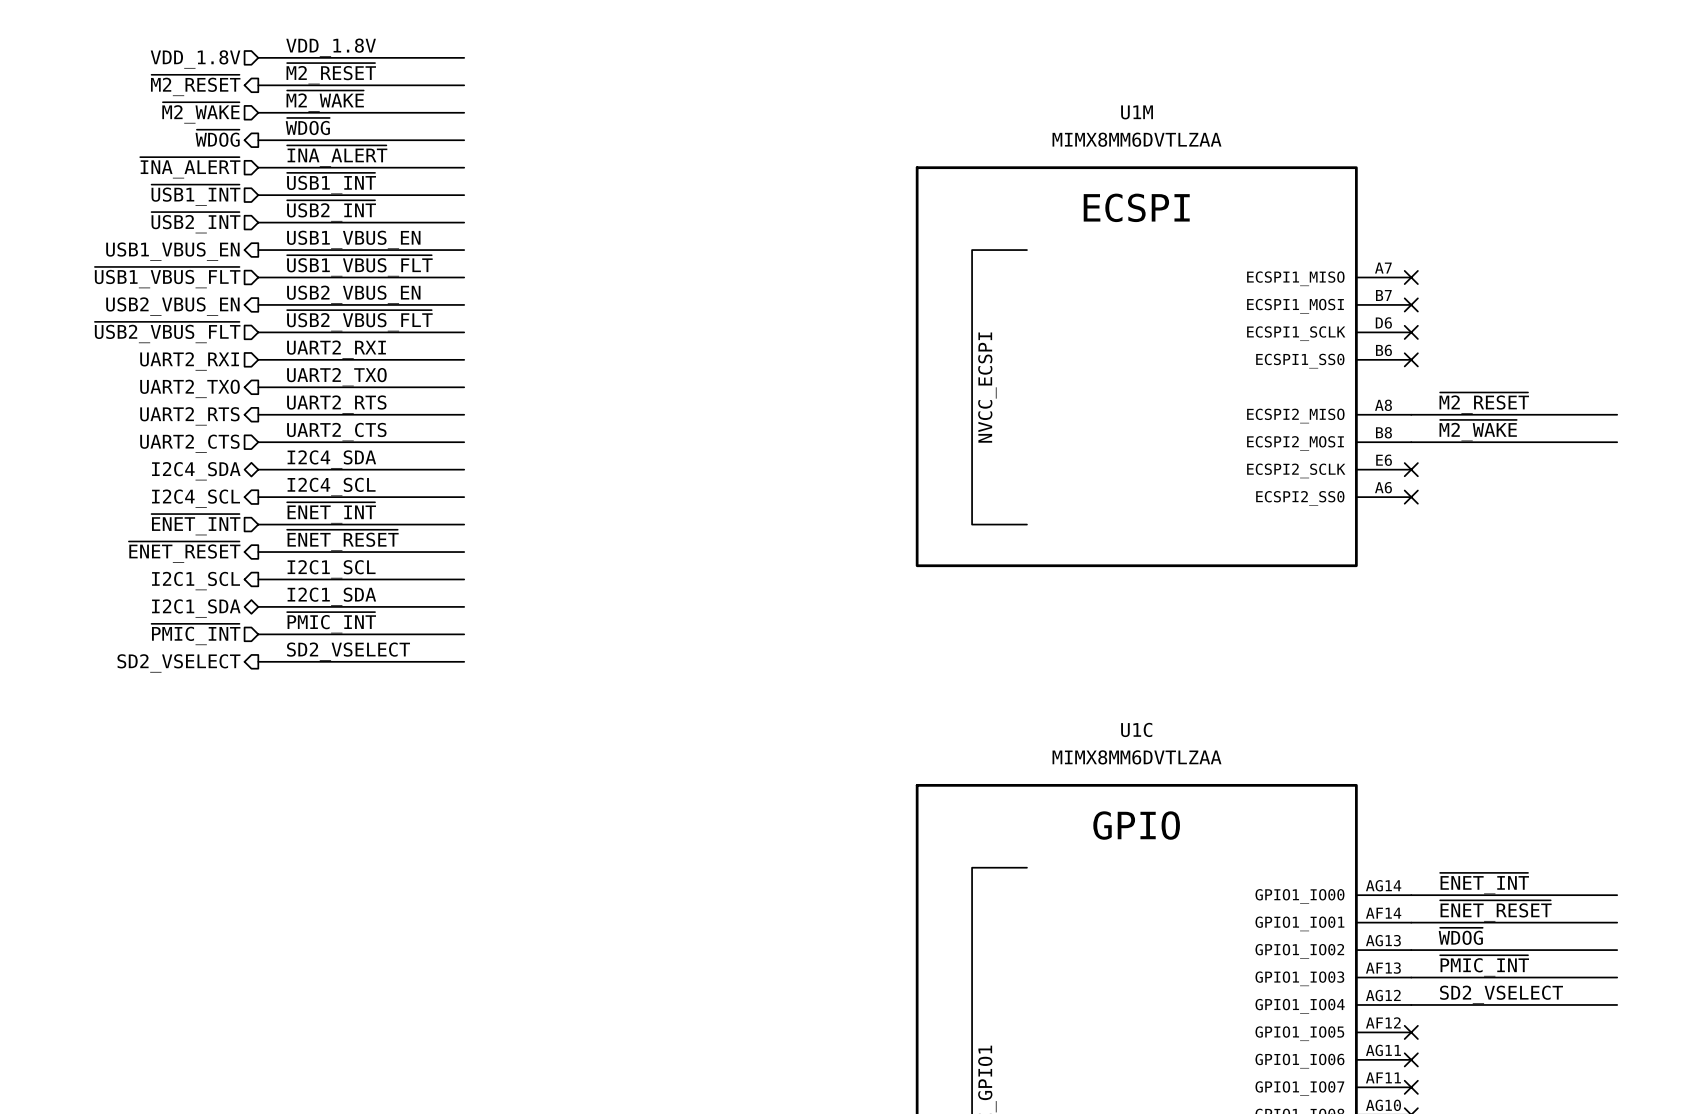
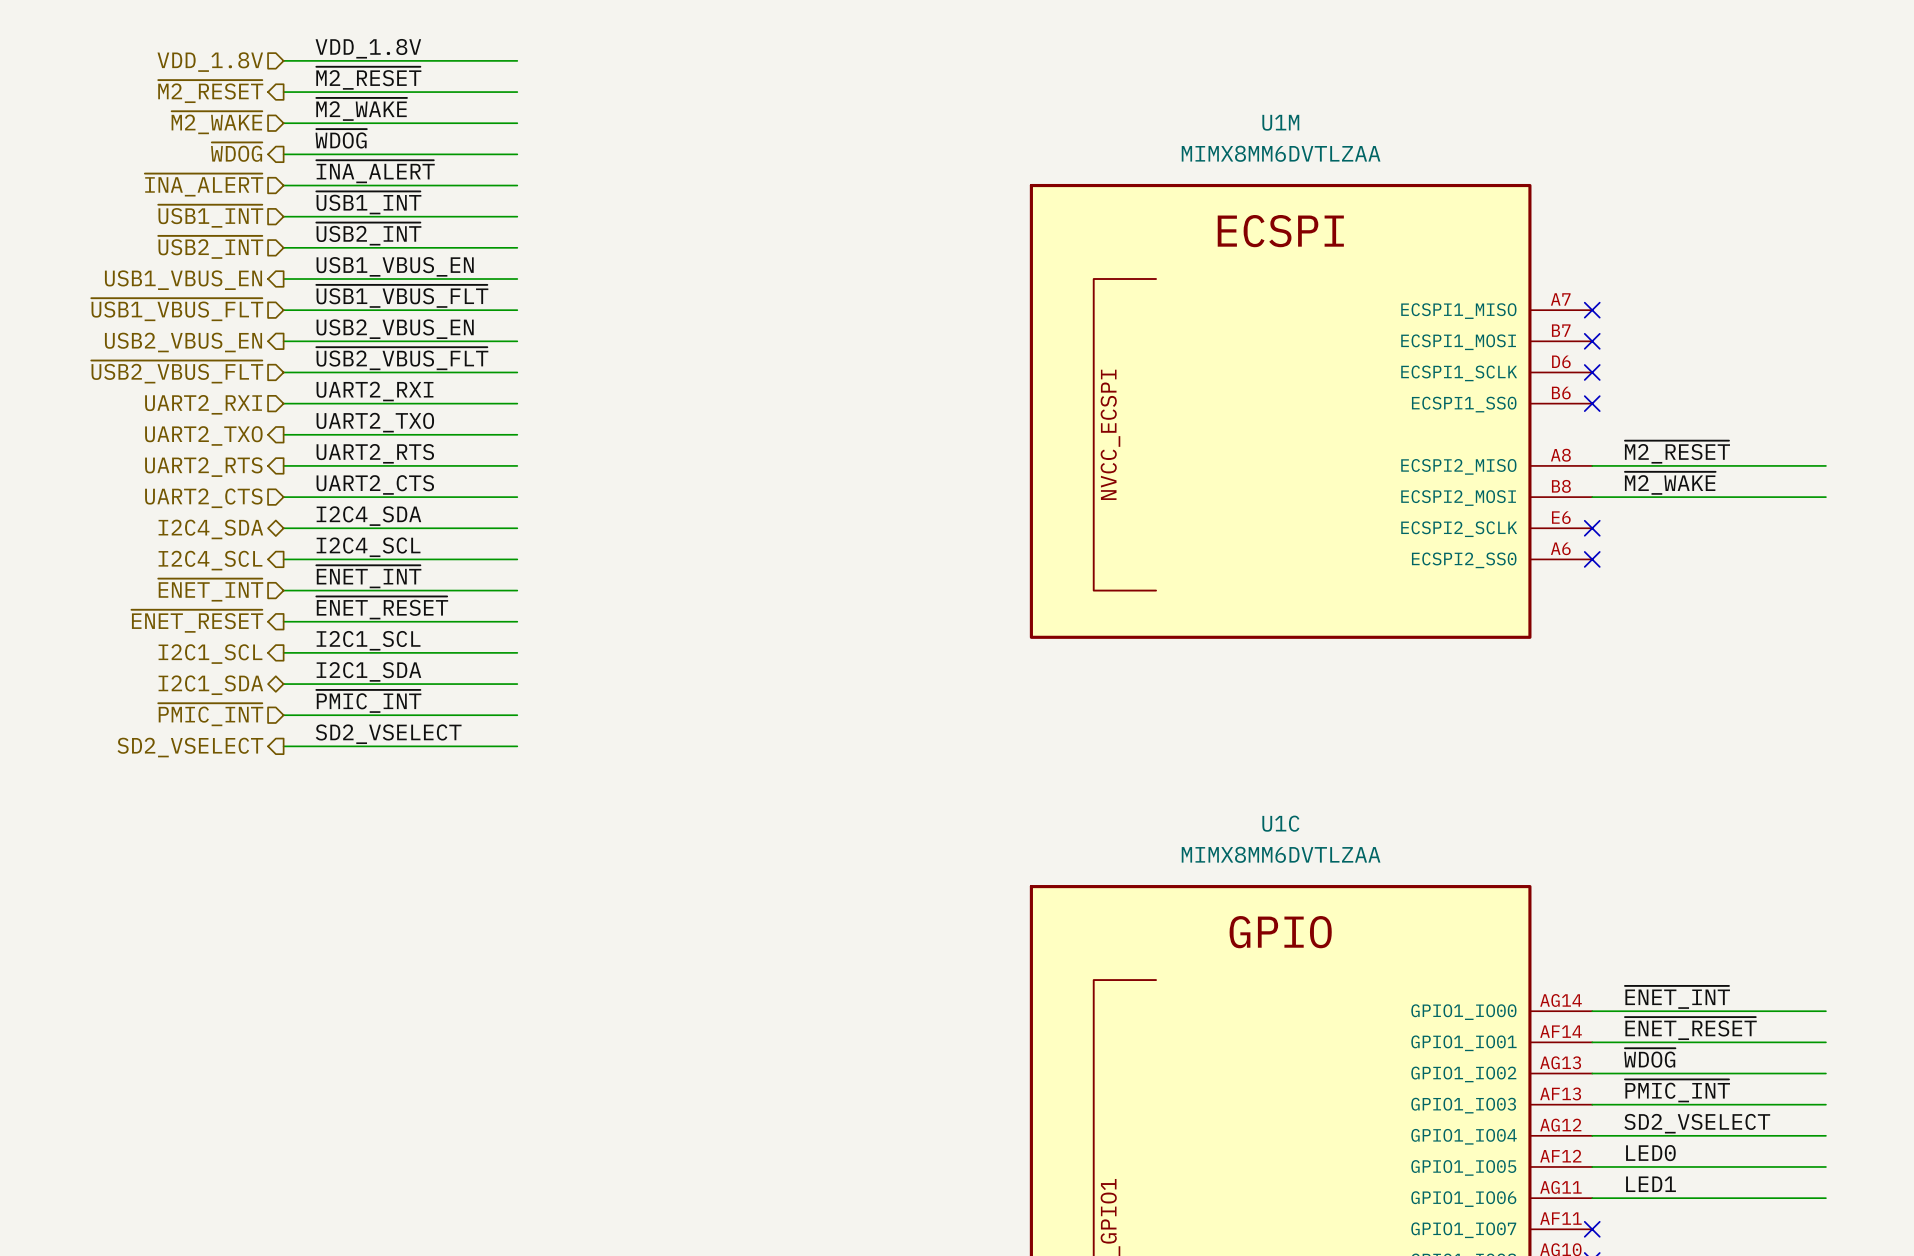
label: none -> LED0 (1650, 1153)
wire: none -> (1592, 1166) (1825, 1166)
no-connect mark: (1411, 1032) -> none
label: none -> LED1 (1651, 1184)
wire: none -> (1592, 1198) (1825, 1198)
no-connect mark: (1411, 1059) -> none

